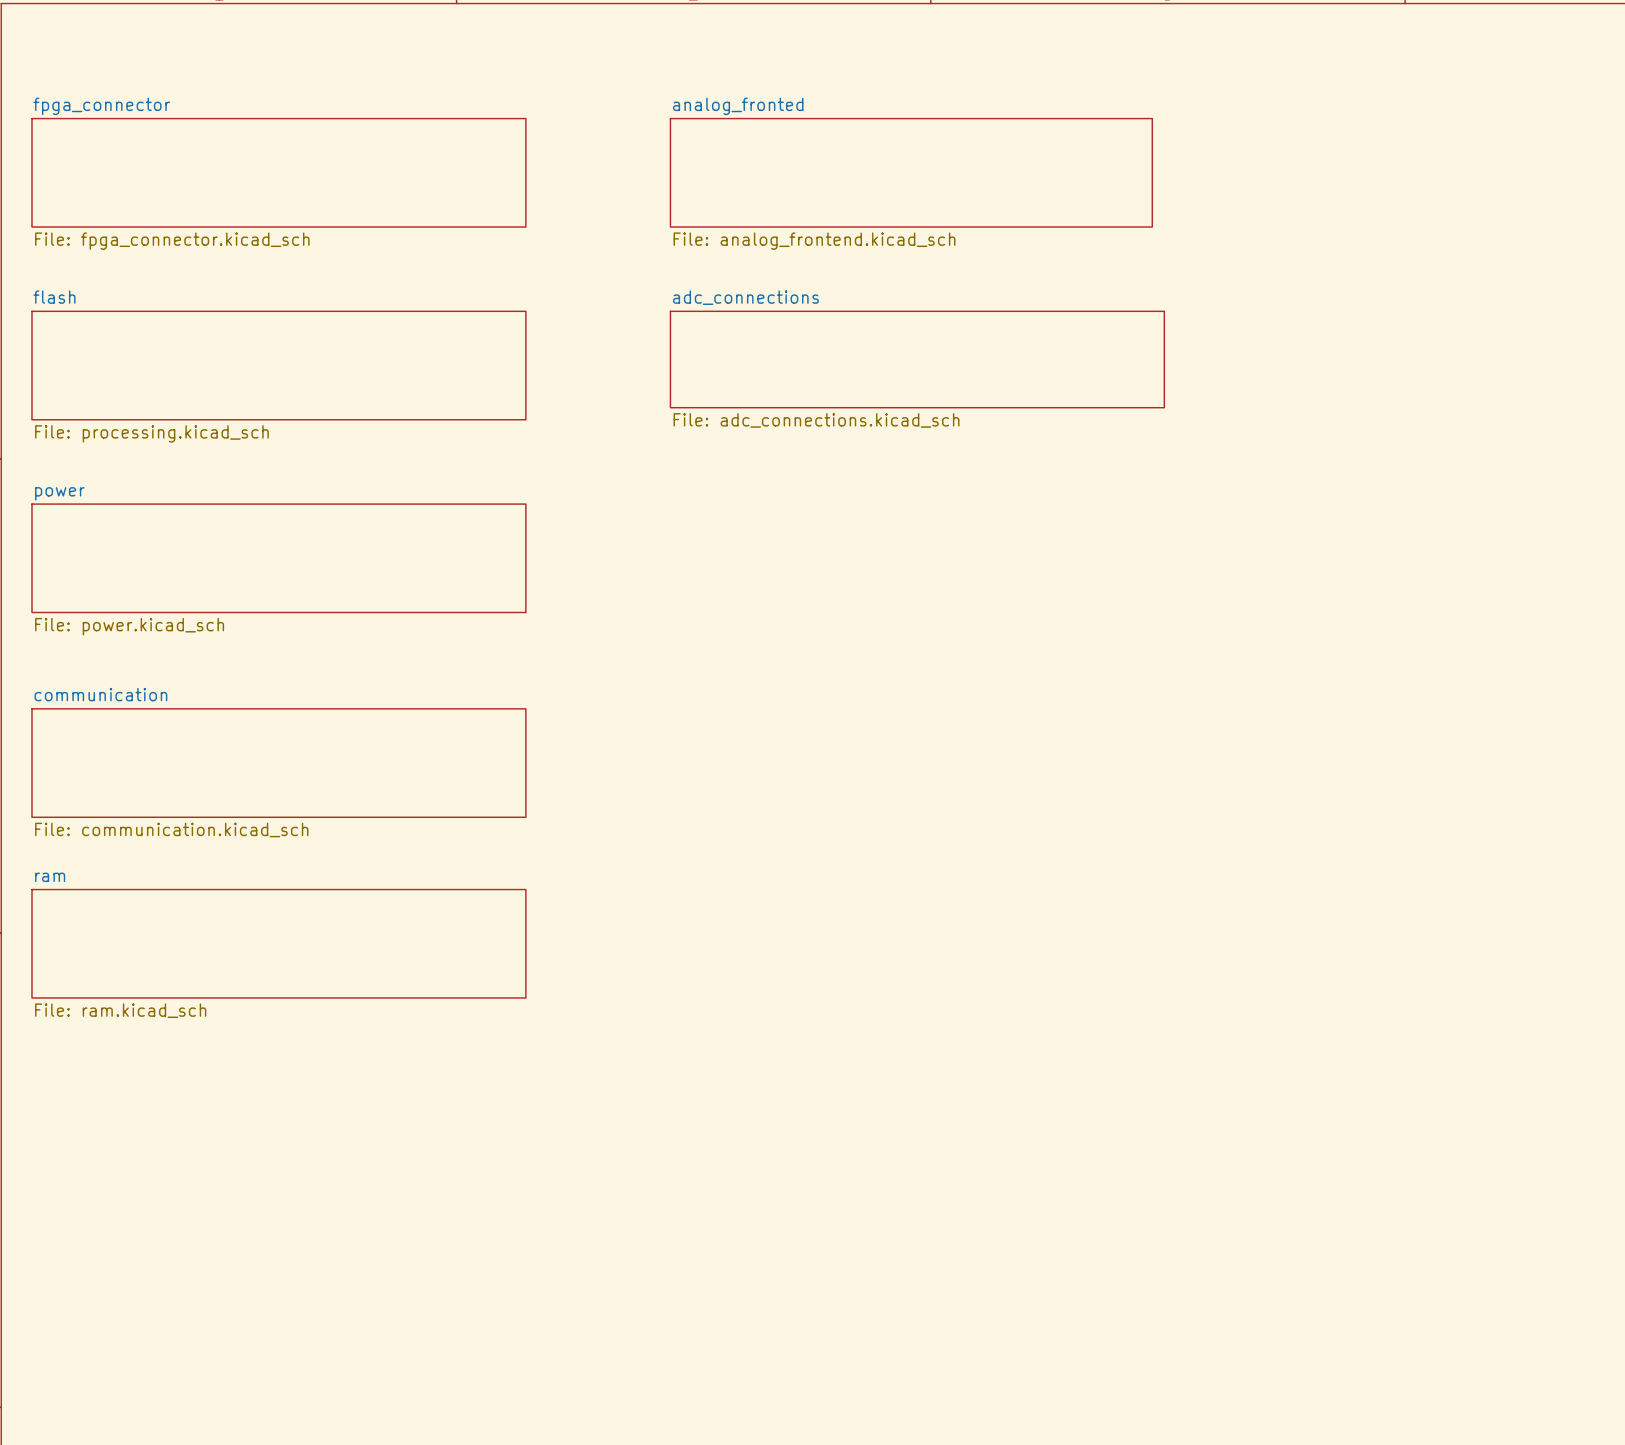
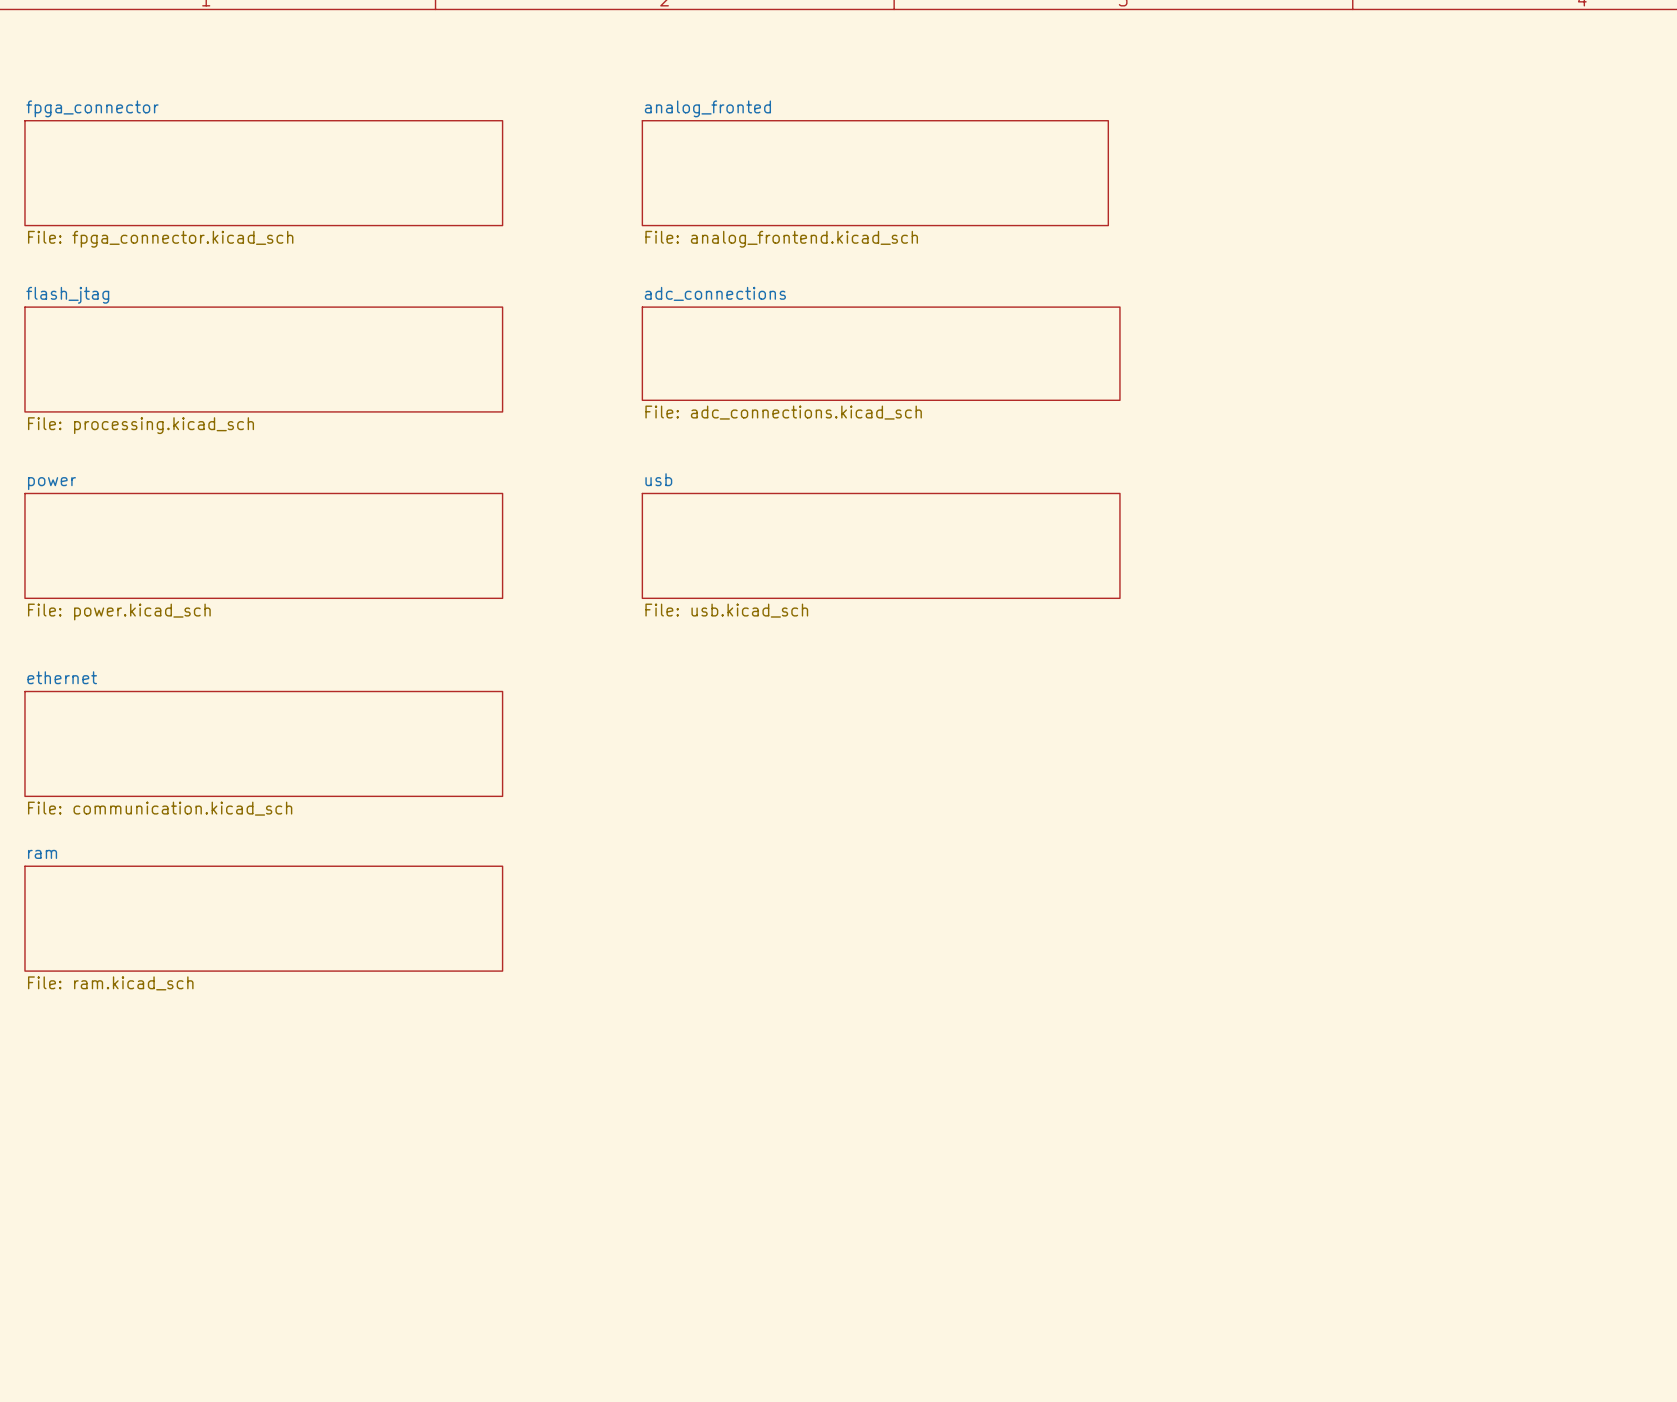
sheet flash name: flash (54, 297) -> flash_jtag (67, 295)
sheet usb: none -> File: usb.kicad_sch (881, 545)
sheet communication name: communication (100, 694) -> ethernet (62, 677)

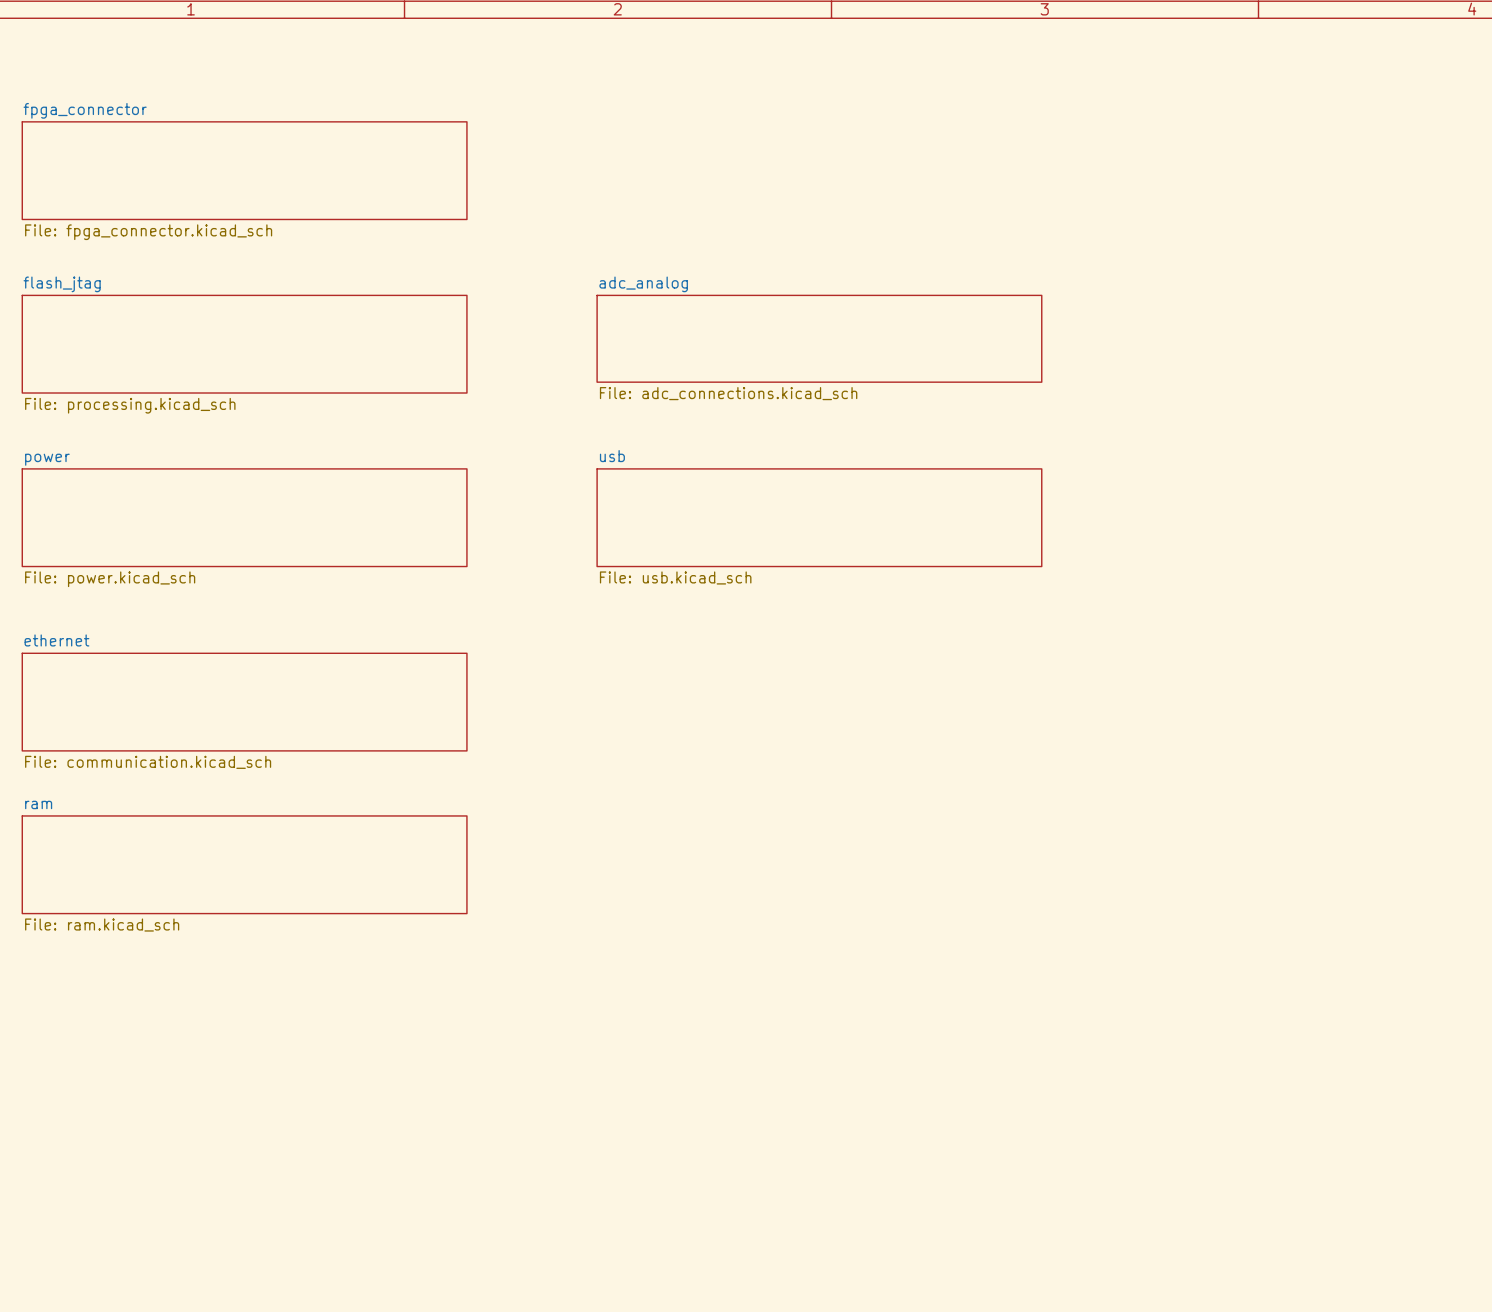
sheet analog_fronted: File: analog_frontend.kicad_sch (875, 173) -> none
sheet adc_connections name: adc_connections (715, 293) -> adc_analog (643, 284)

